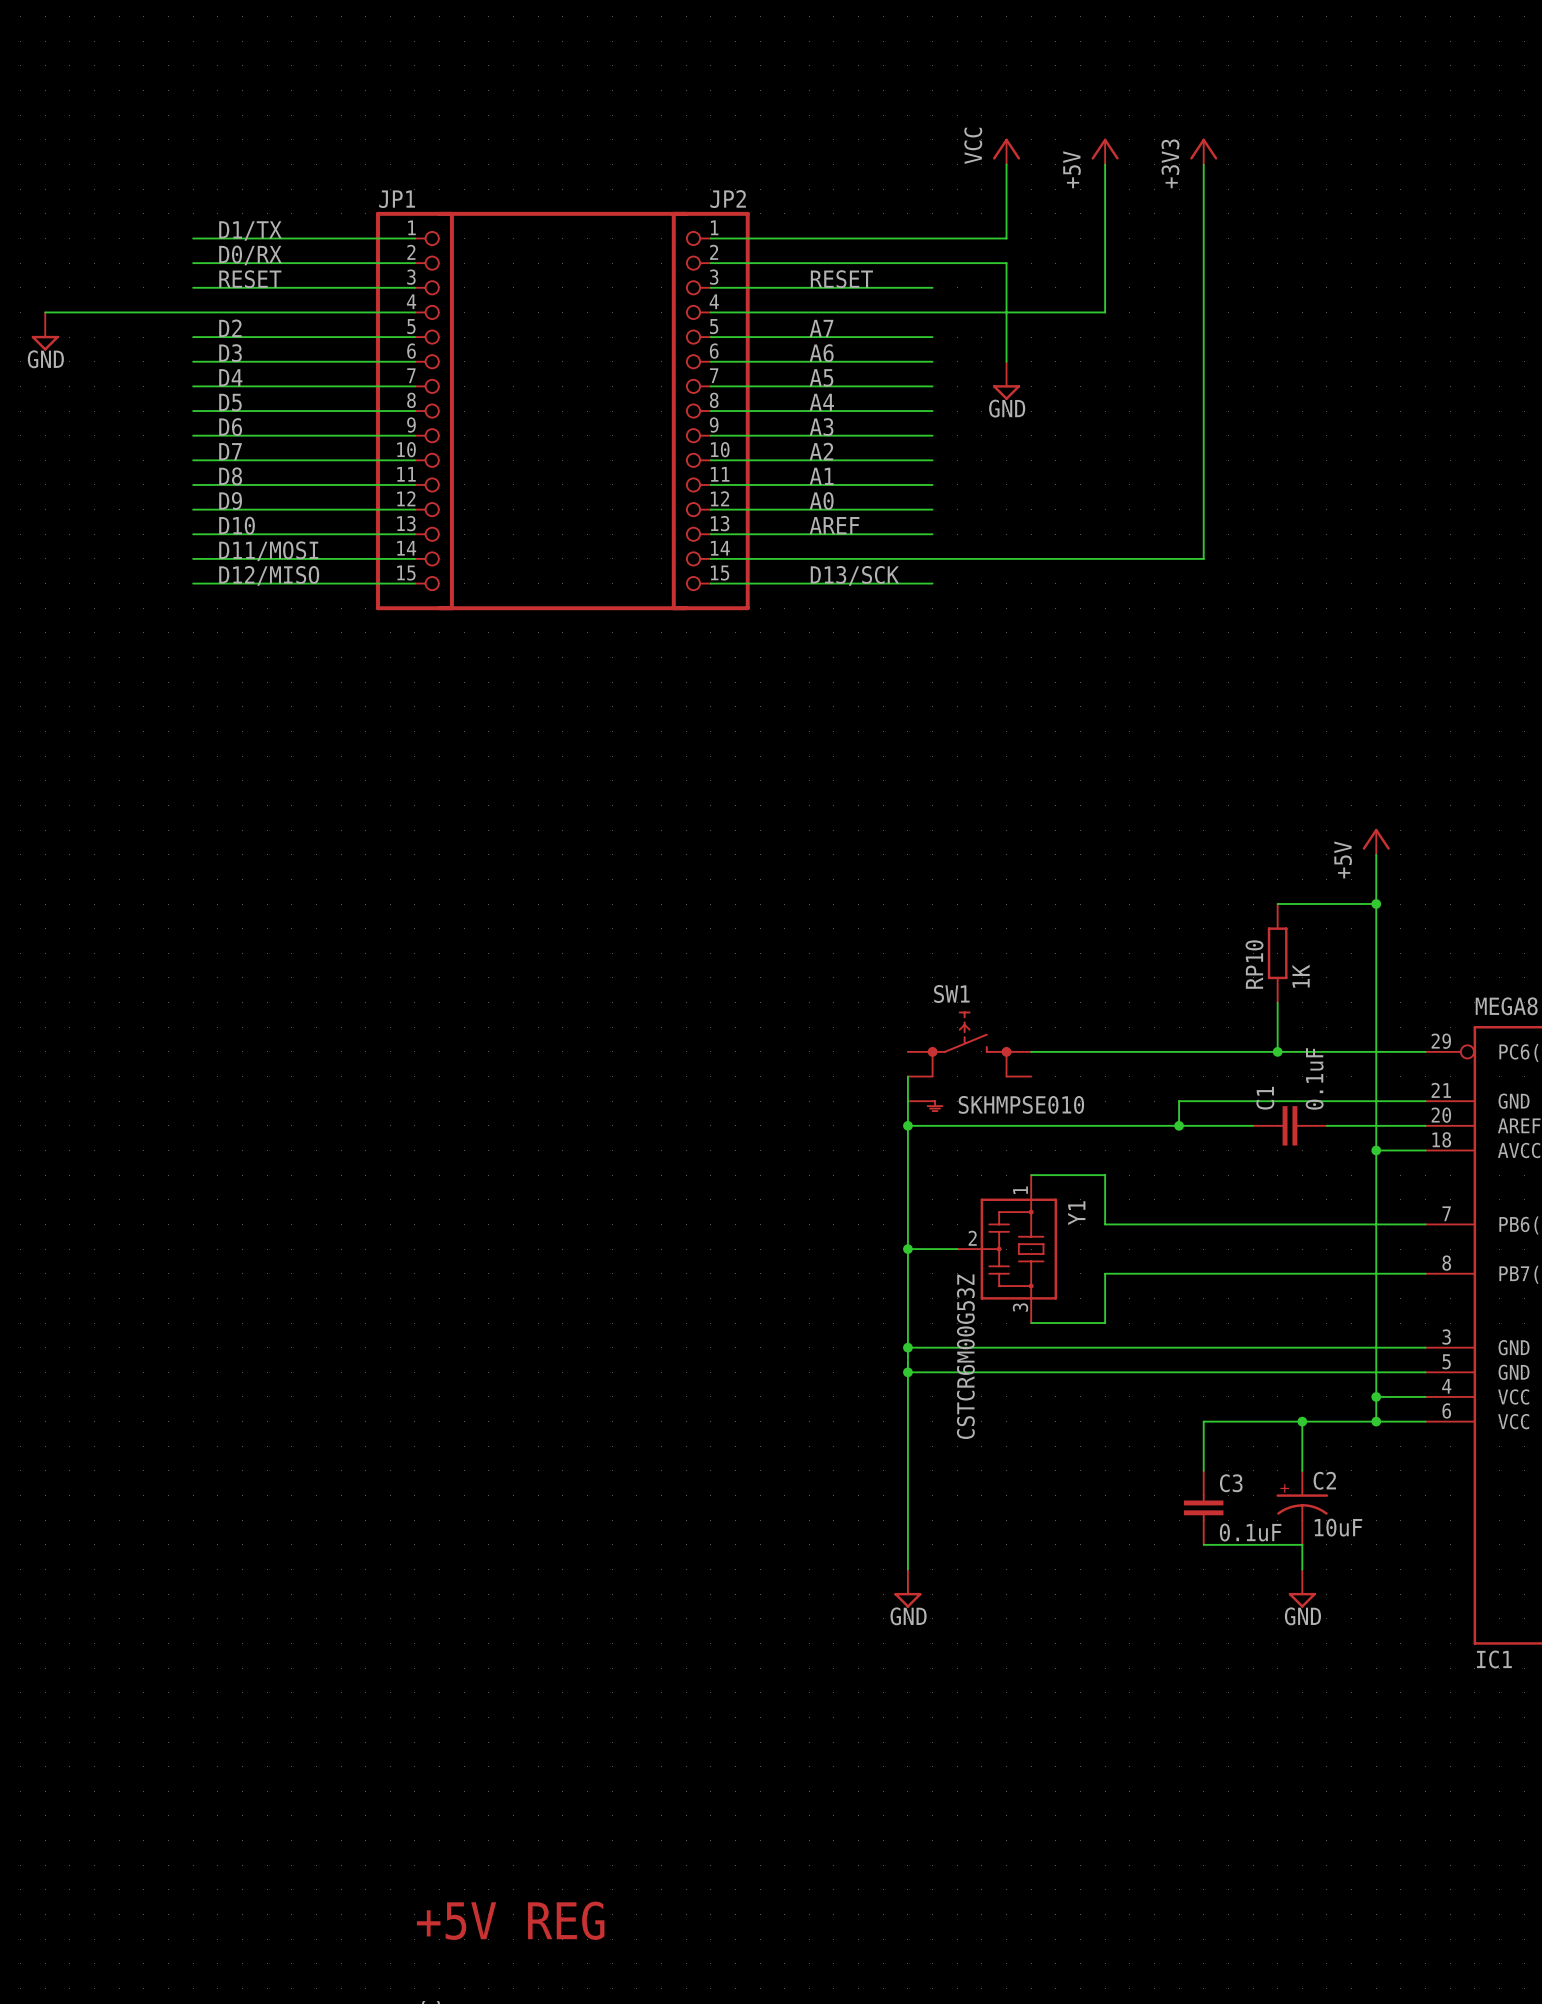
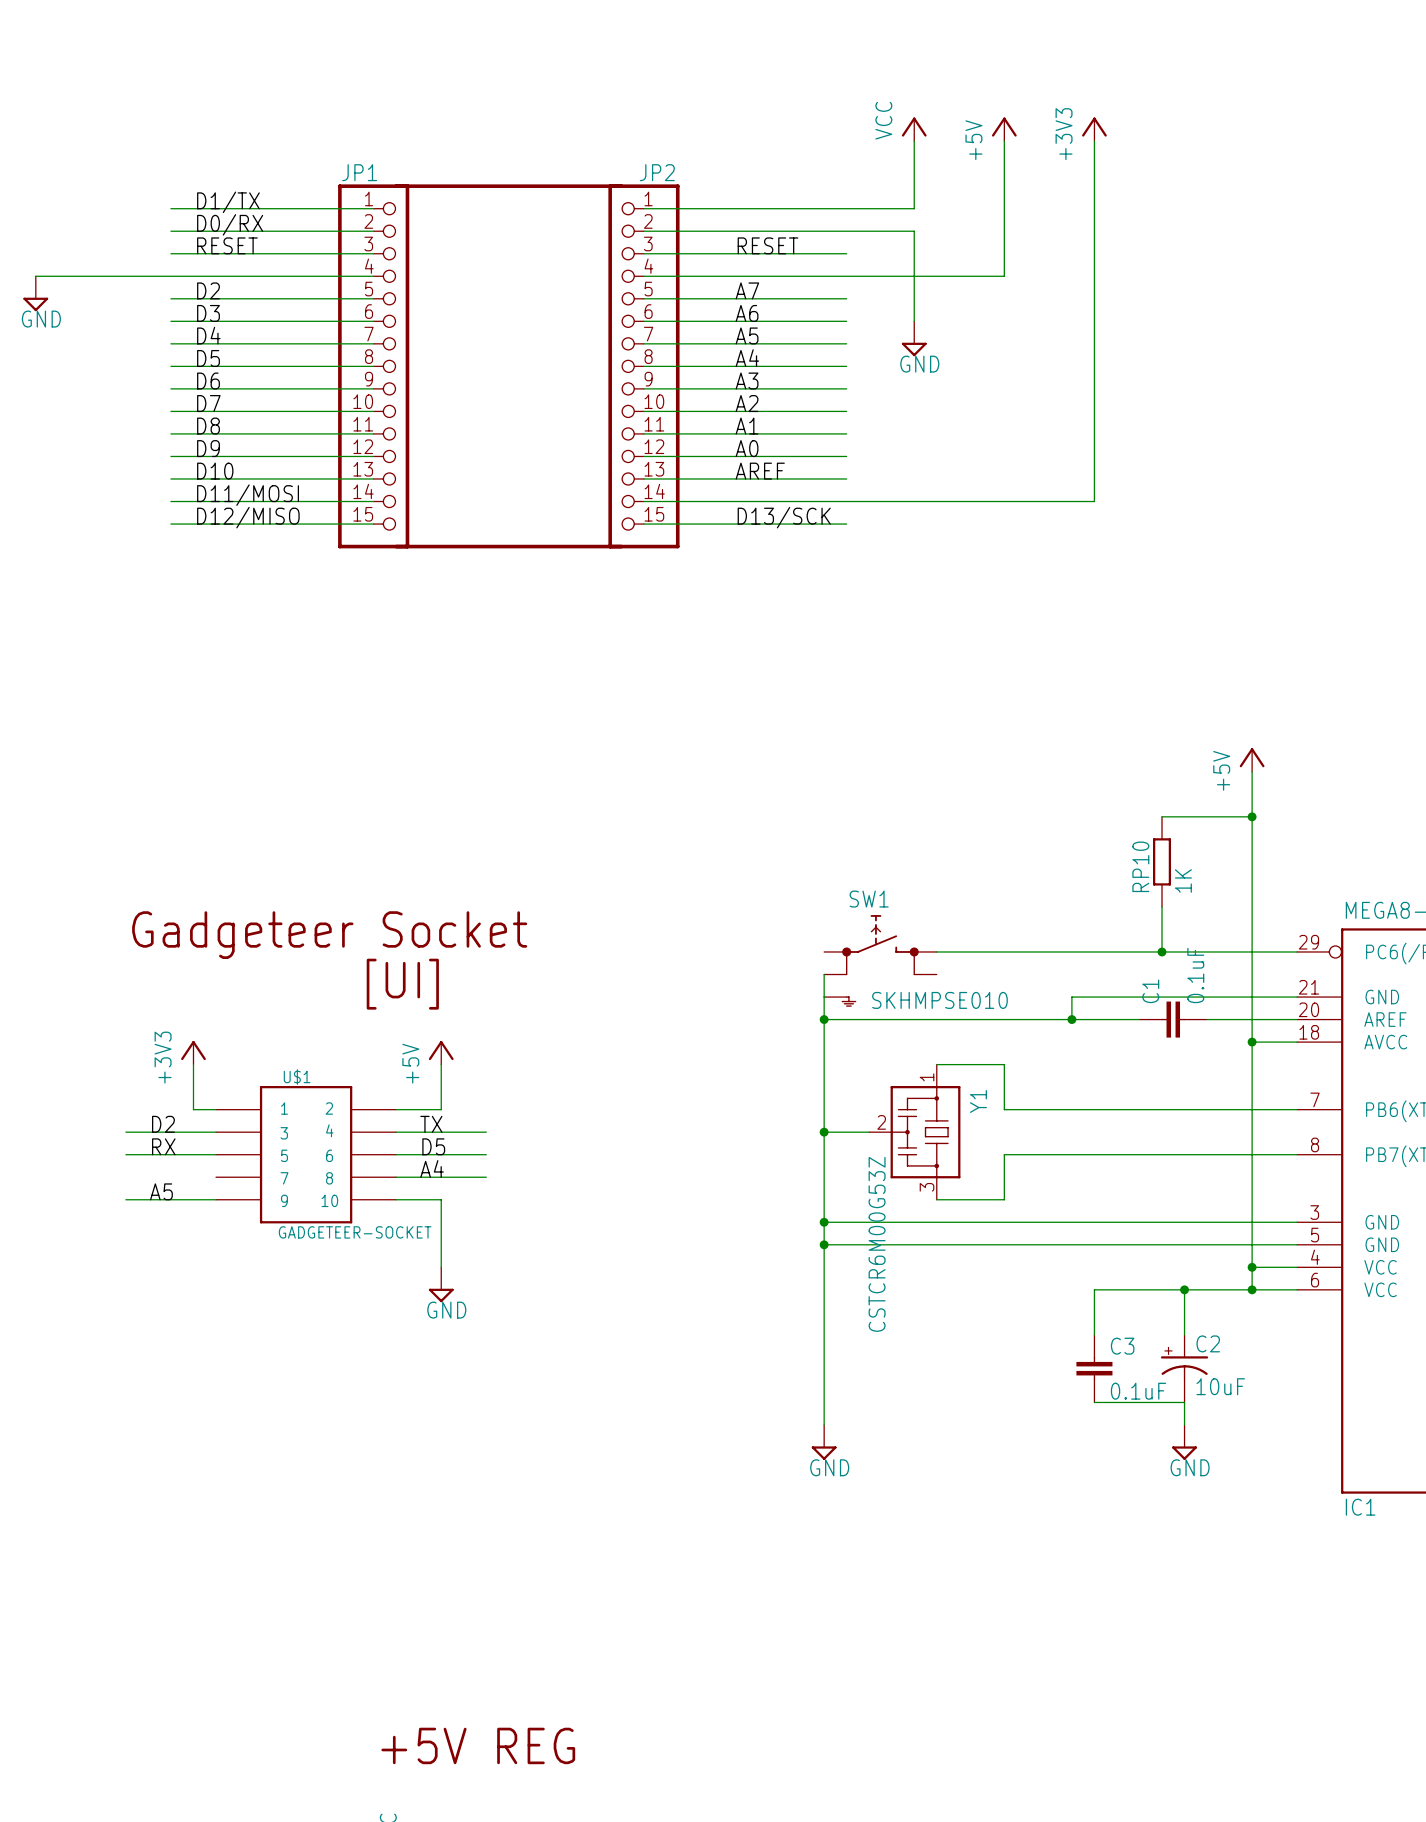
text: none -> Gadgeteer Socket (329, 935)
text: none -> [UI] (402, 984)
power symbol: none -> +3V3 (193, 1052)
power symbol: none -> +5V (441, 1052)
wire: none -> (193, 1064) (193, 1109) (216, 1109)
wire: none -> (441, 1064) (441, 1109) (396, 1109)
label: none -> D2 (163, 1124)
label: none -> TX (431, 1124)
wire: none -> (125, 1132) (216, 1132)
wire: none -> (396, 1132) (486, 1132)
label: none -> RX (163, 1146)
label: none -> D5 (433, 1146)
wire: none -> (125, 1154) (216, 1154)
U$1: none -> GADGETEER-SOCKET (306, 1154)
wire: none -> (396, 1154) (486, 1154)
label: none -> A4 (432, 1168)
wire: none -> (396, 1177) (486, 1177)
label: none -> A5 (161, 1191)
wire: none -> (125, 1199) (216, 1199)
wire: none -> (396, 1199) (441, 1199) (441, 1267)
power symbol: none -> GND (441, 1284)

